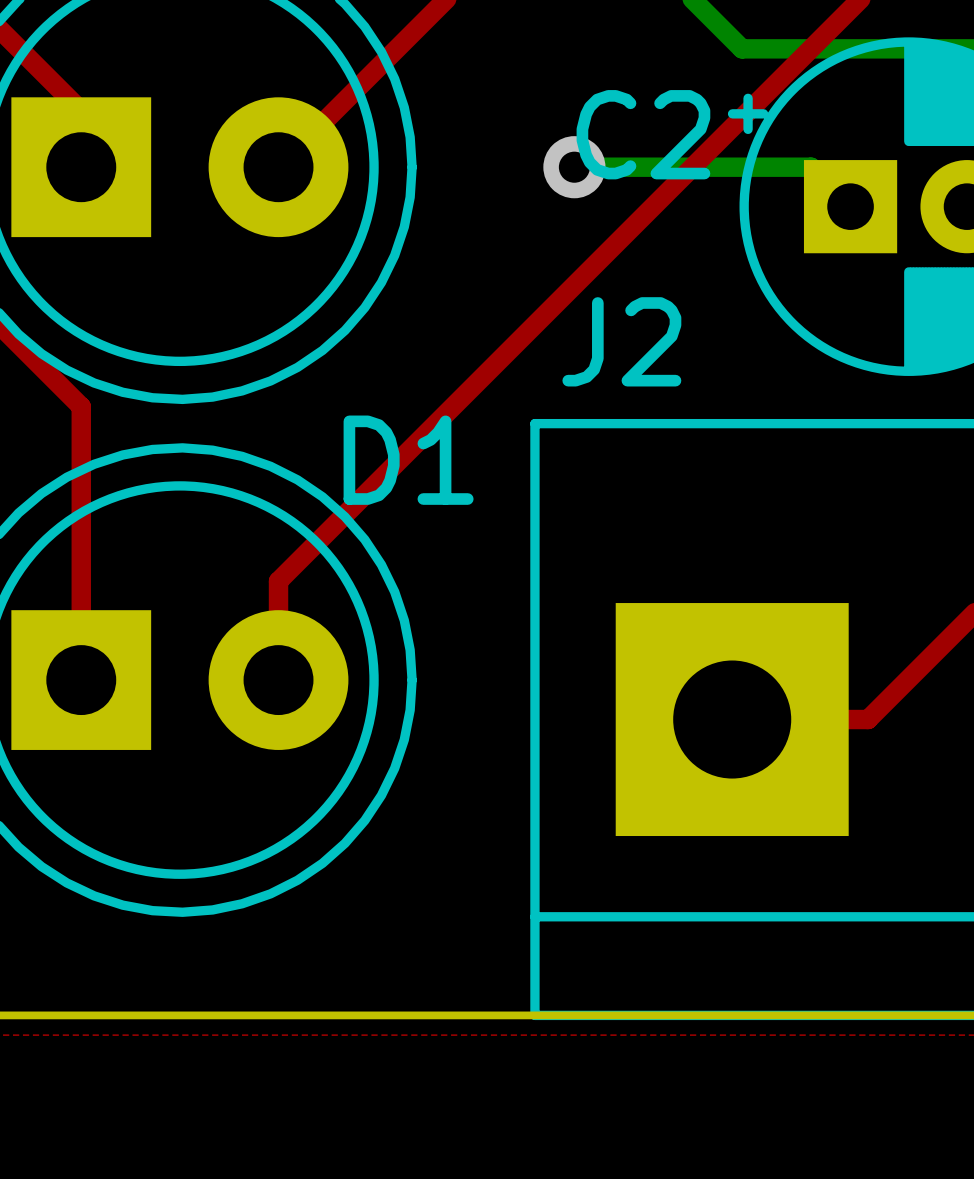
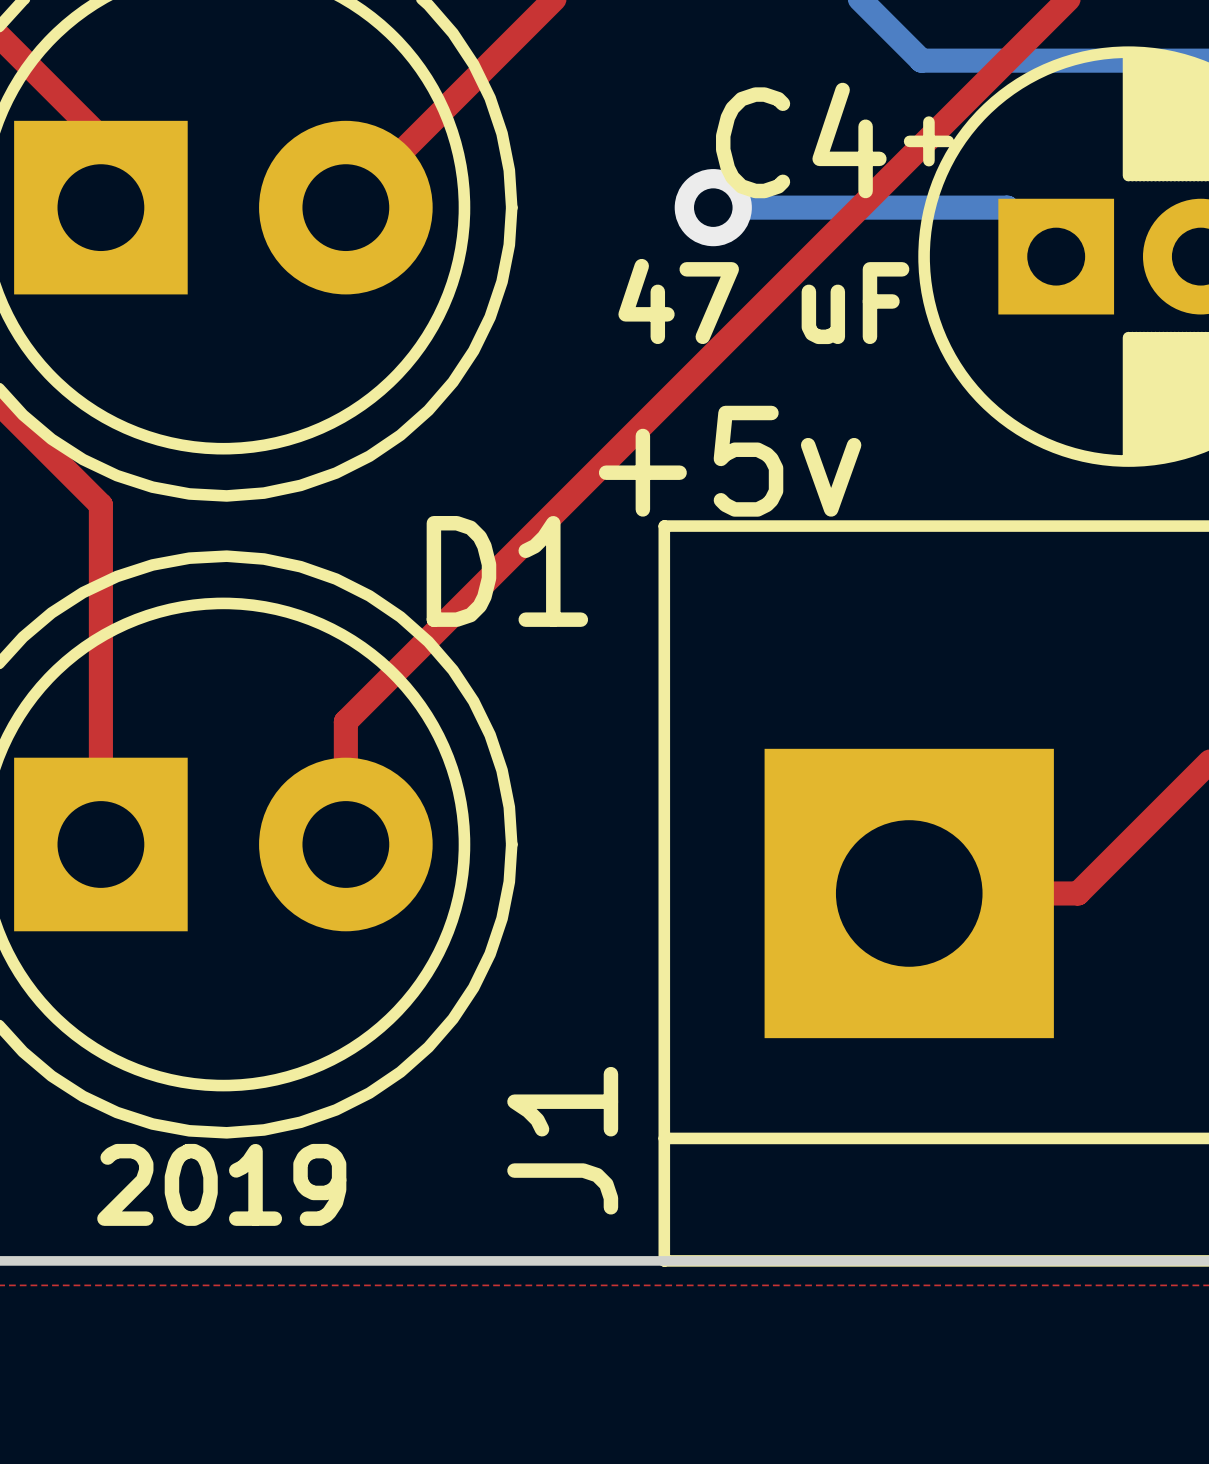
C2 name: C2 (643, 134) -> C4 (801, 140)
text: none -> 47 uF (763, 301)
J2 name: J2 (621, 341) -> J1 (562, 1140)
text: none -> +5v (730, 461)
text: none -> 2019 (221, 1184)

